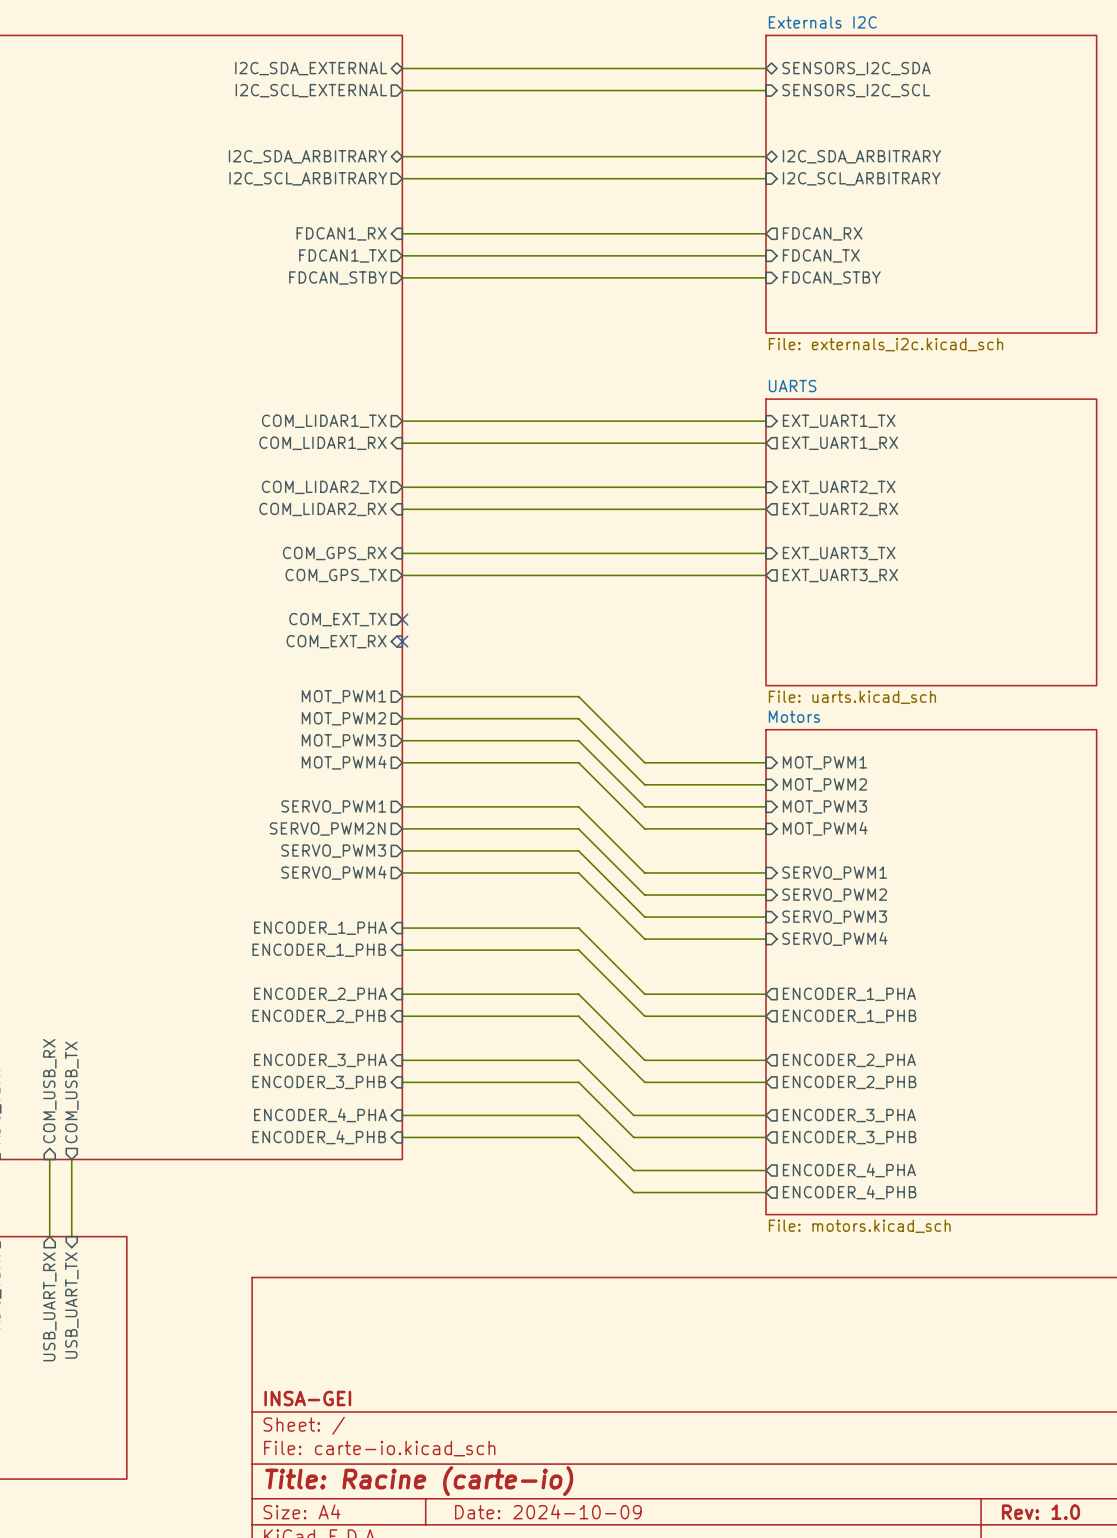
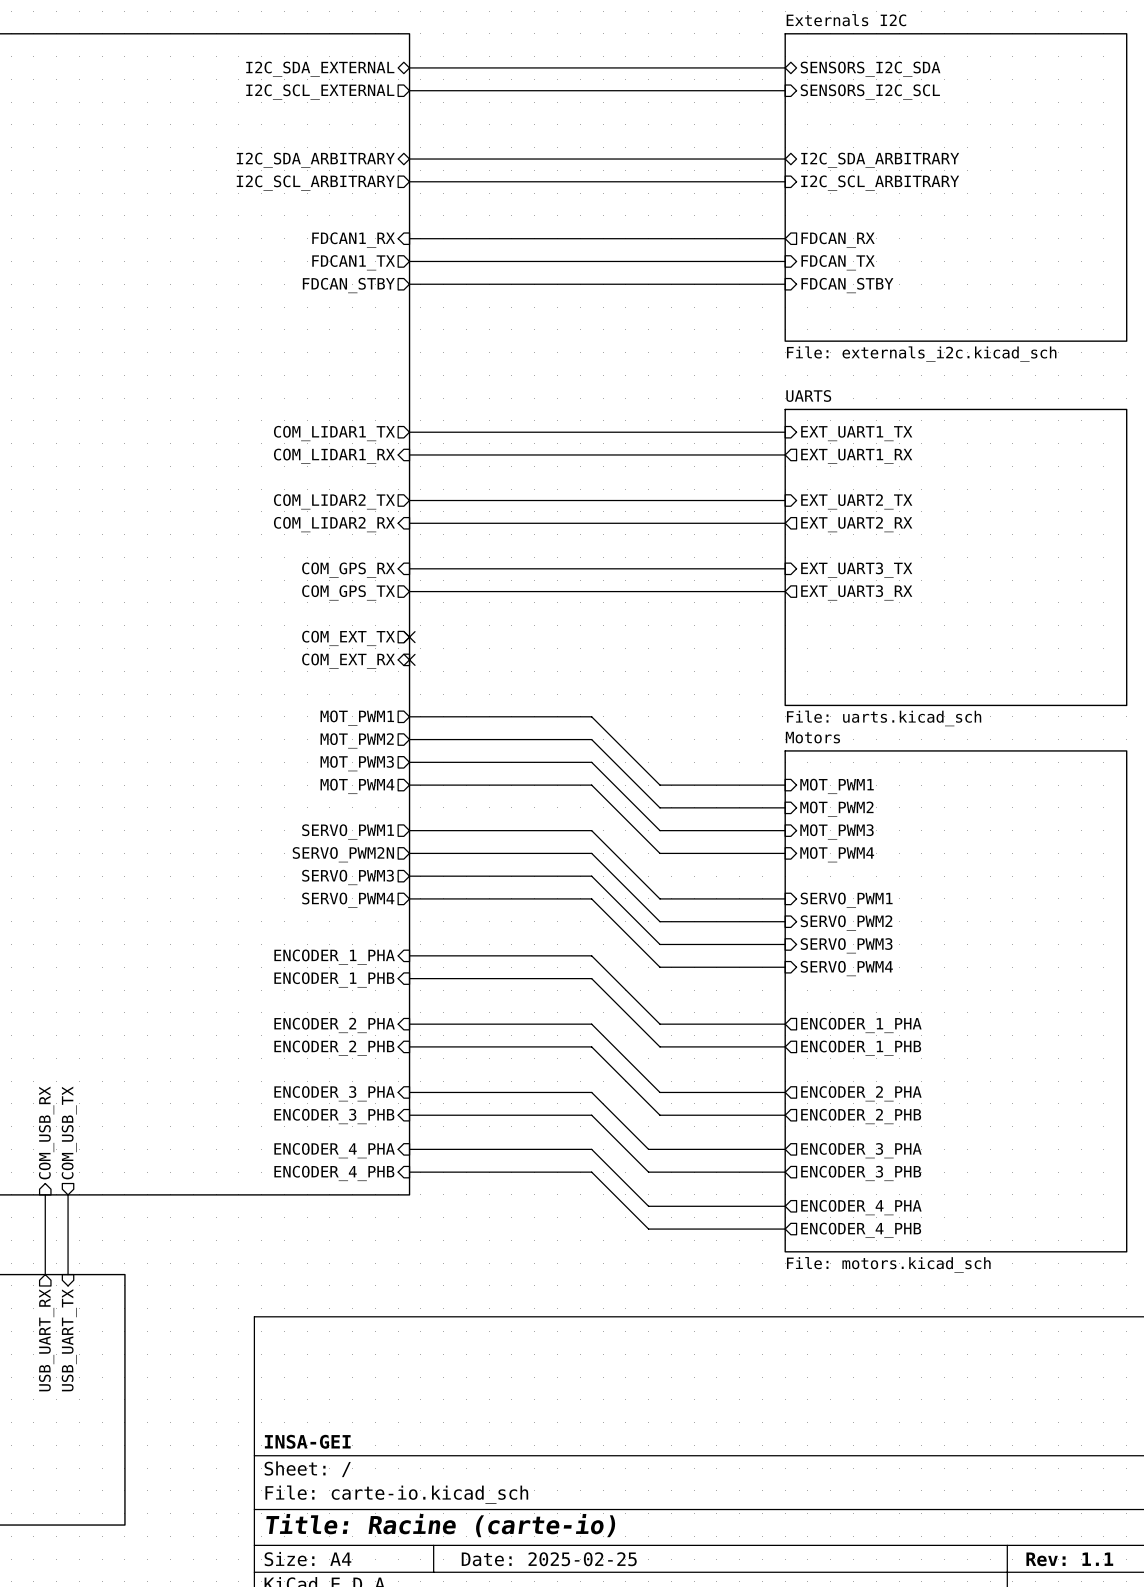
title block: Date: 2024-10-09 (548, 1511) -> Date: 2025-02-25 (549, 1559)
title block: Rev: 1.0 (1041, 1512) -> Rev: 1.1 (1069, 1559)

